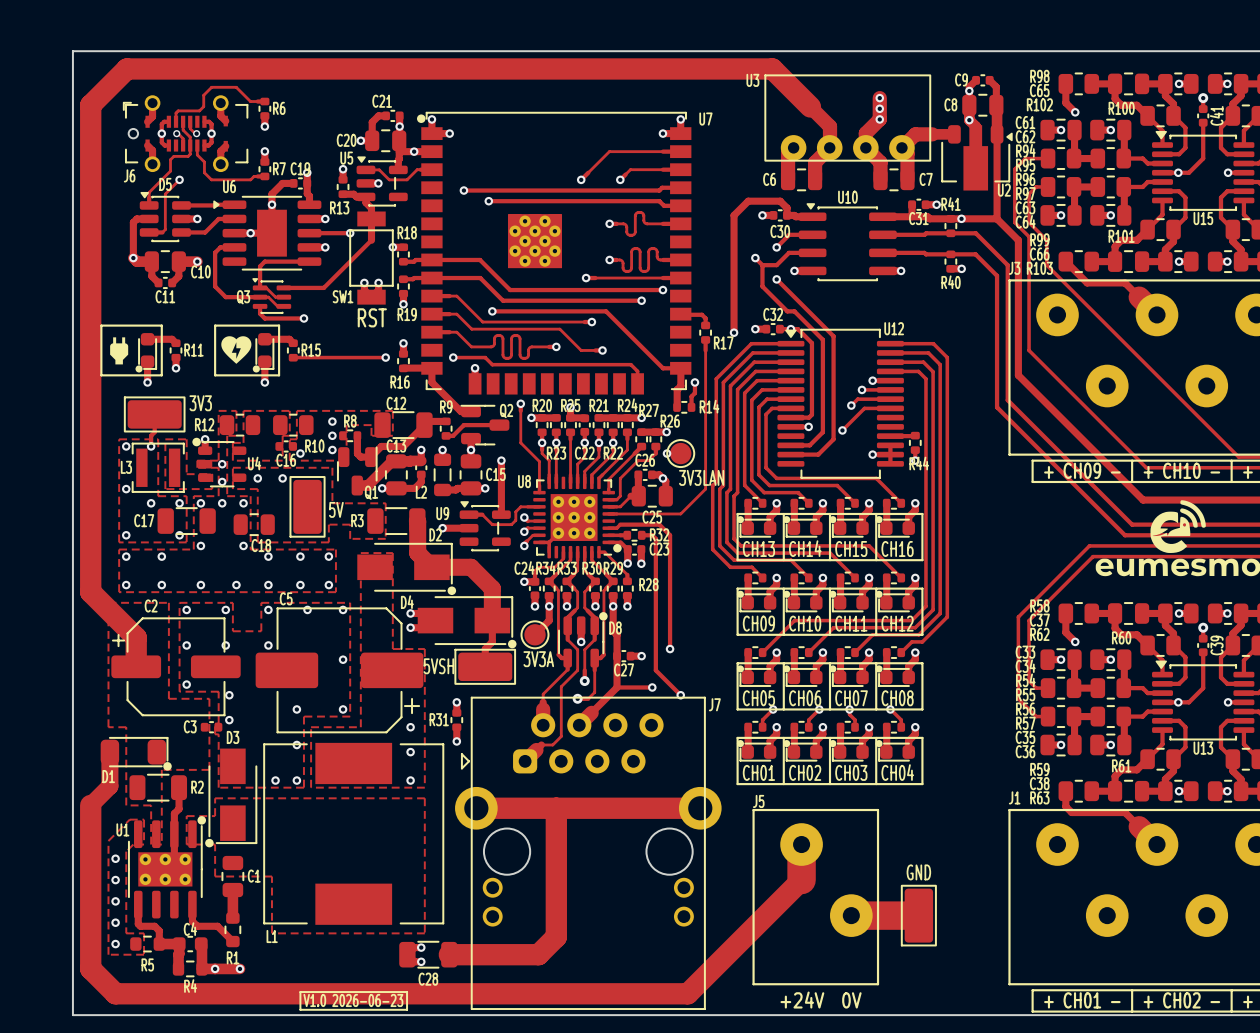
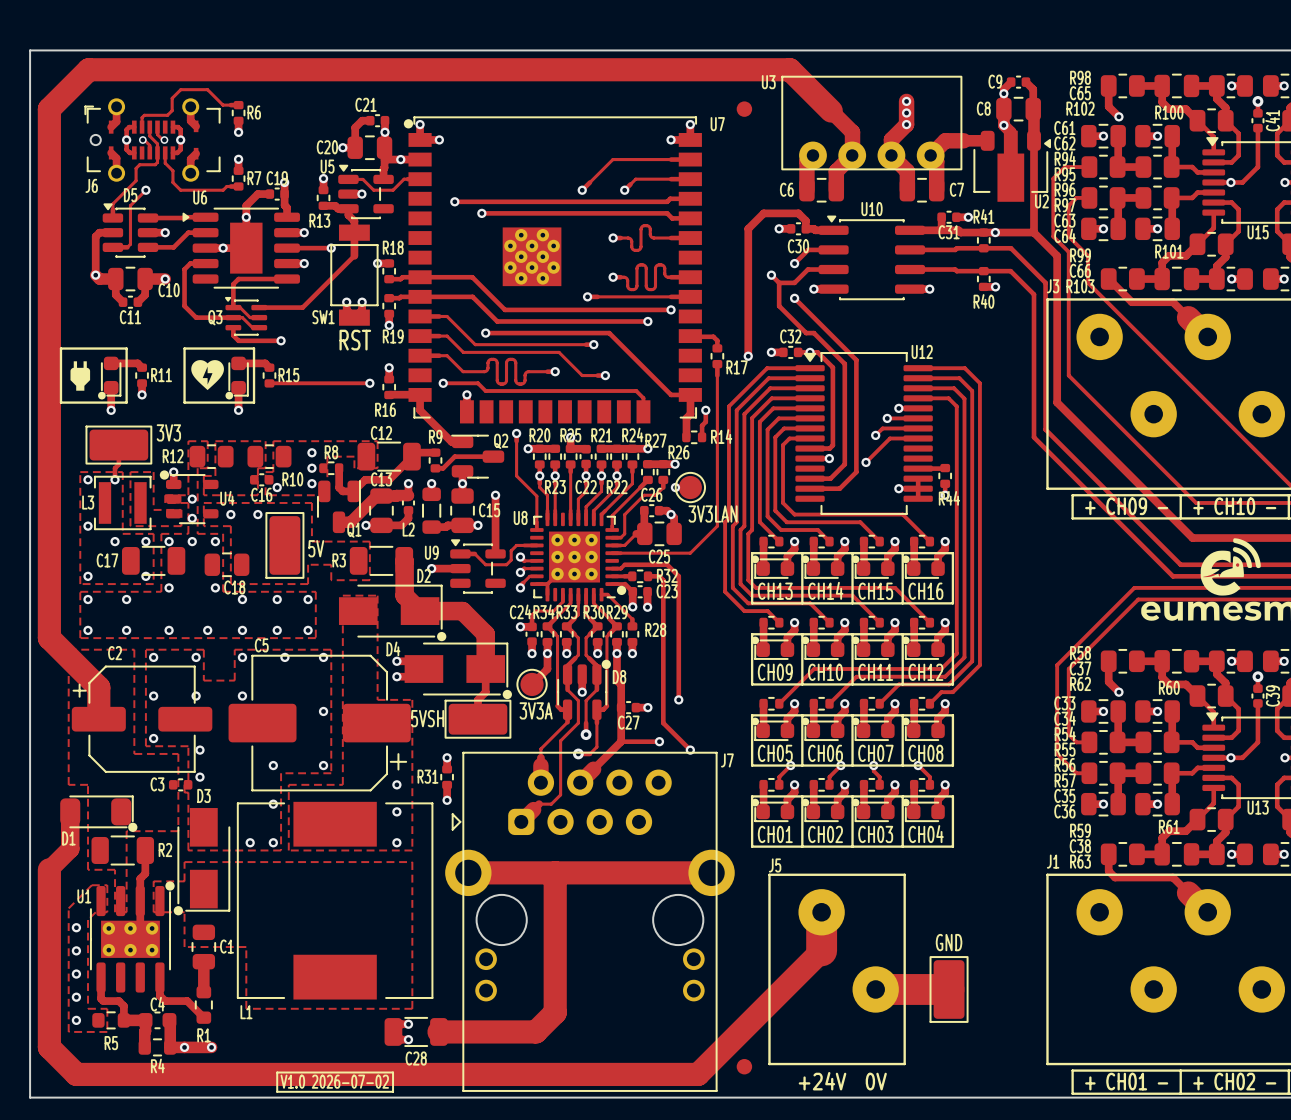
part: none -> (744, 109)
part: none -> (744, 1066)
text: V1.0 2026-06-23 (353, 1000) -> V1.0 2026-07-02 (334, 1081)

